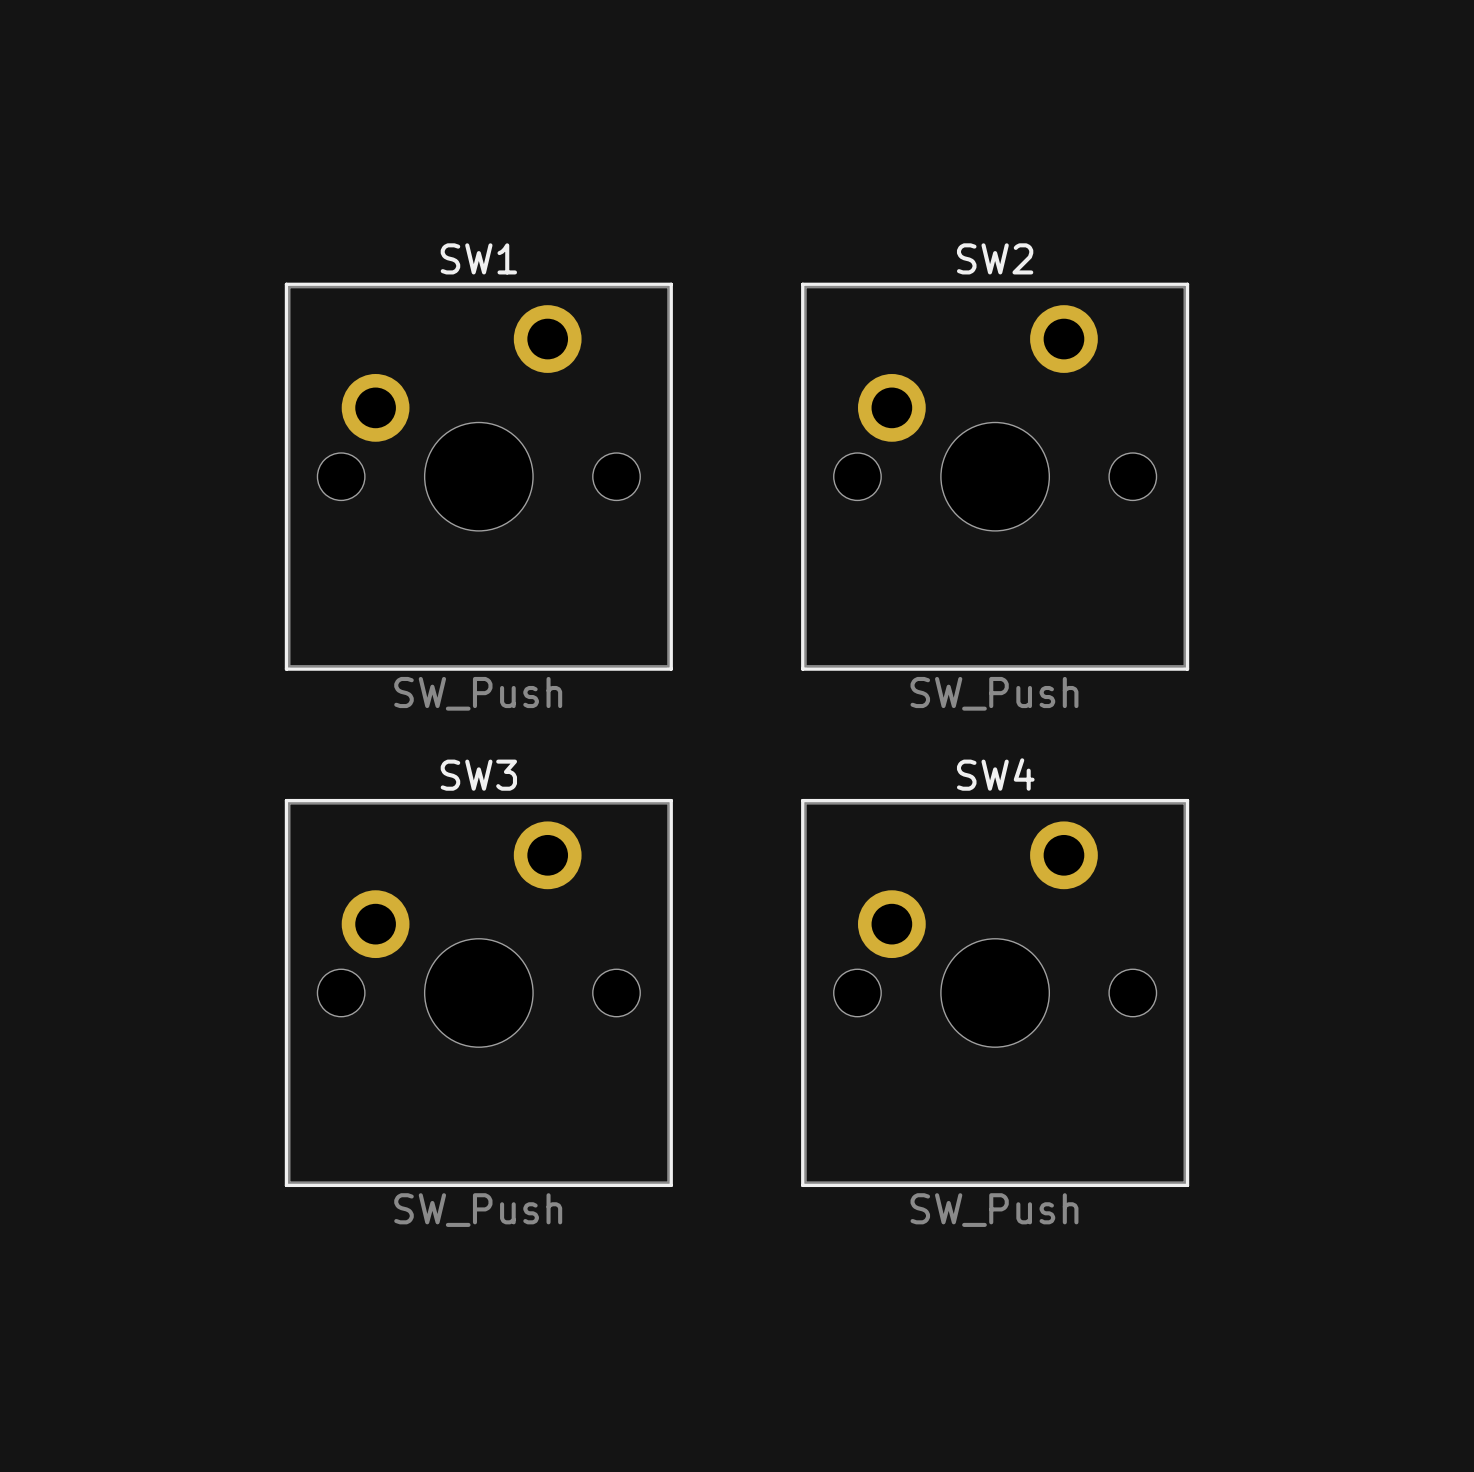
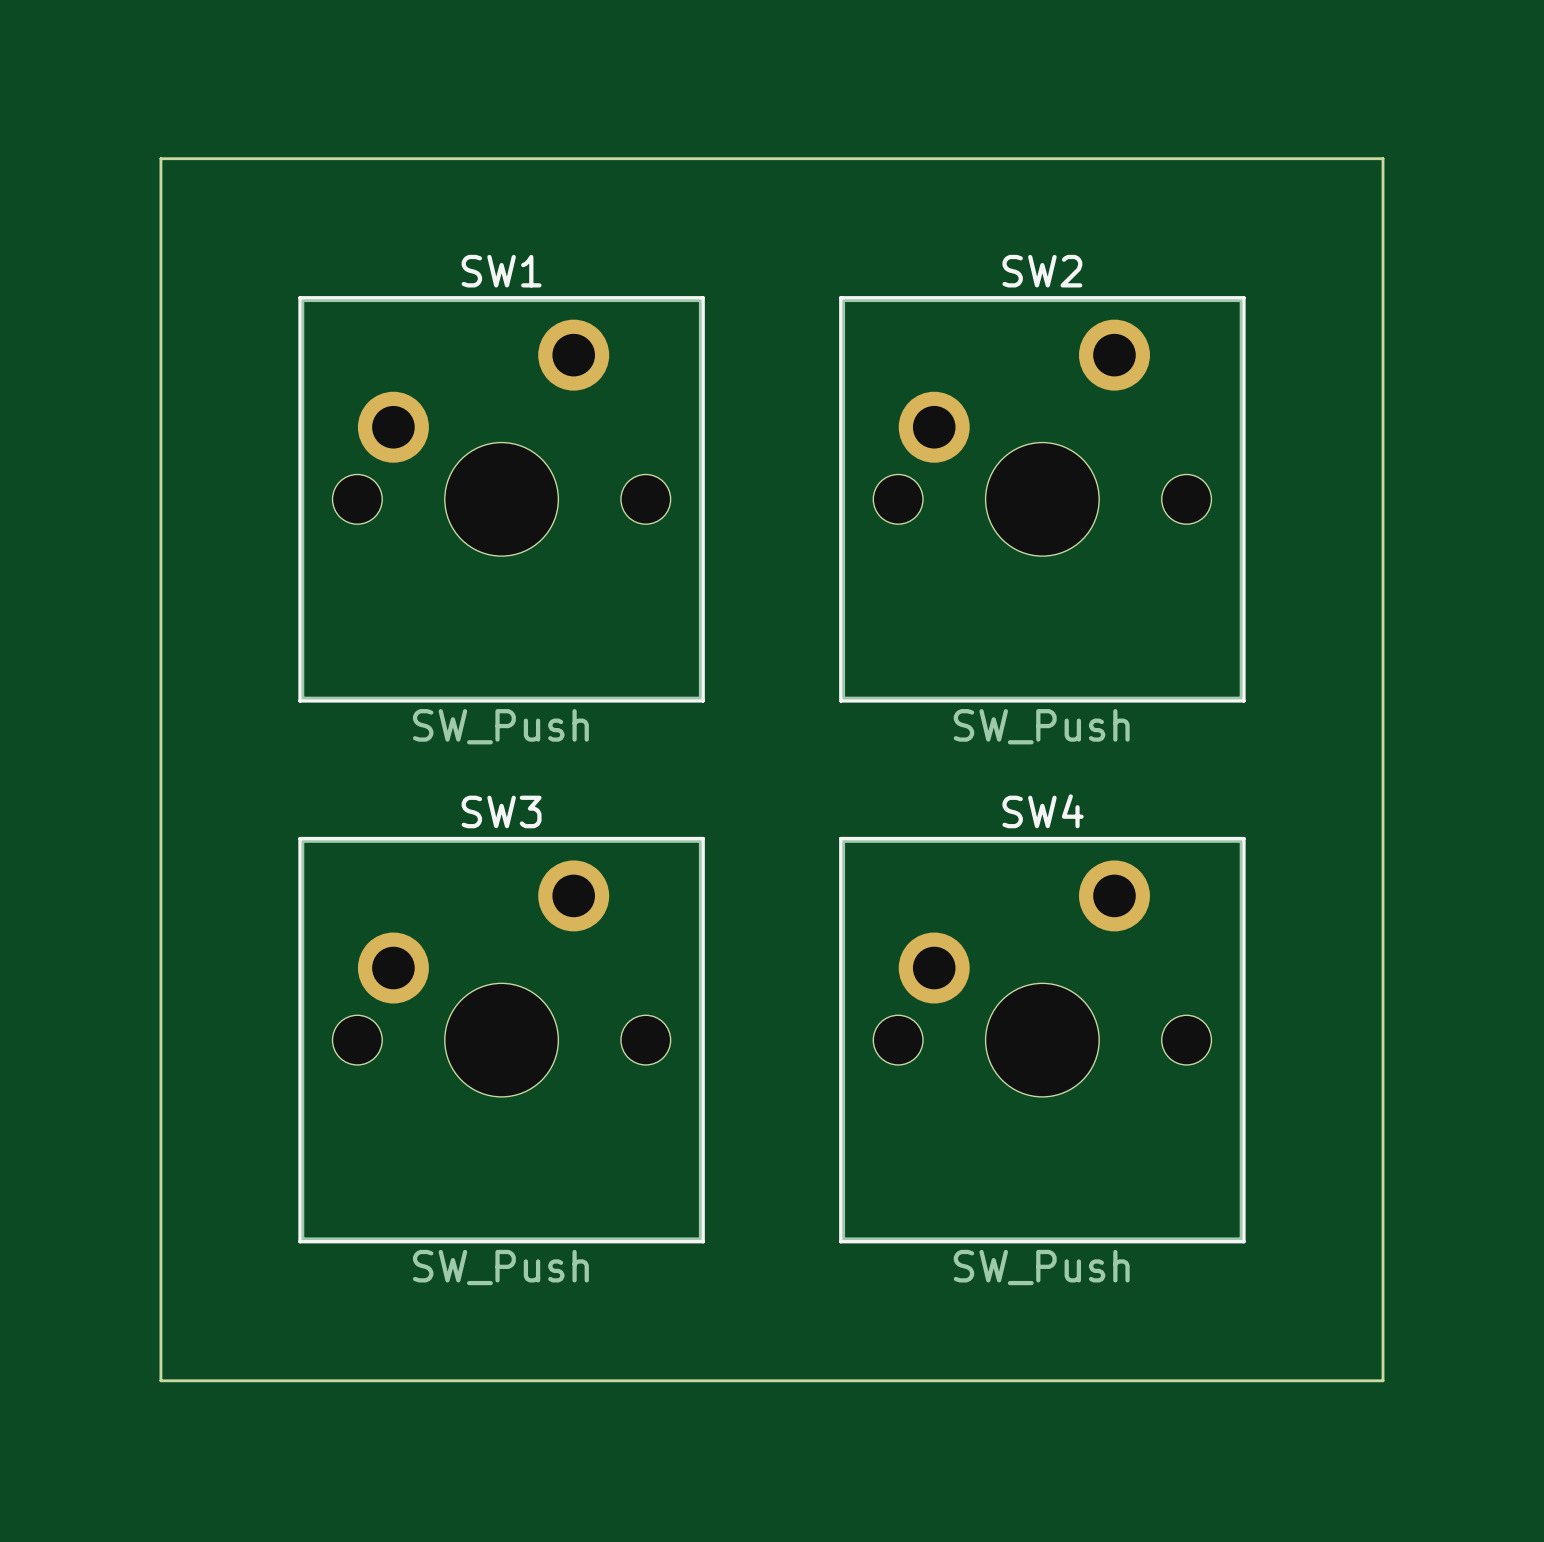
board edge: none -> (160, 158) (160, 1380) (1383, 1380) (1383, 158) (160, 158)

